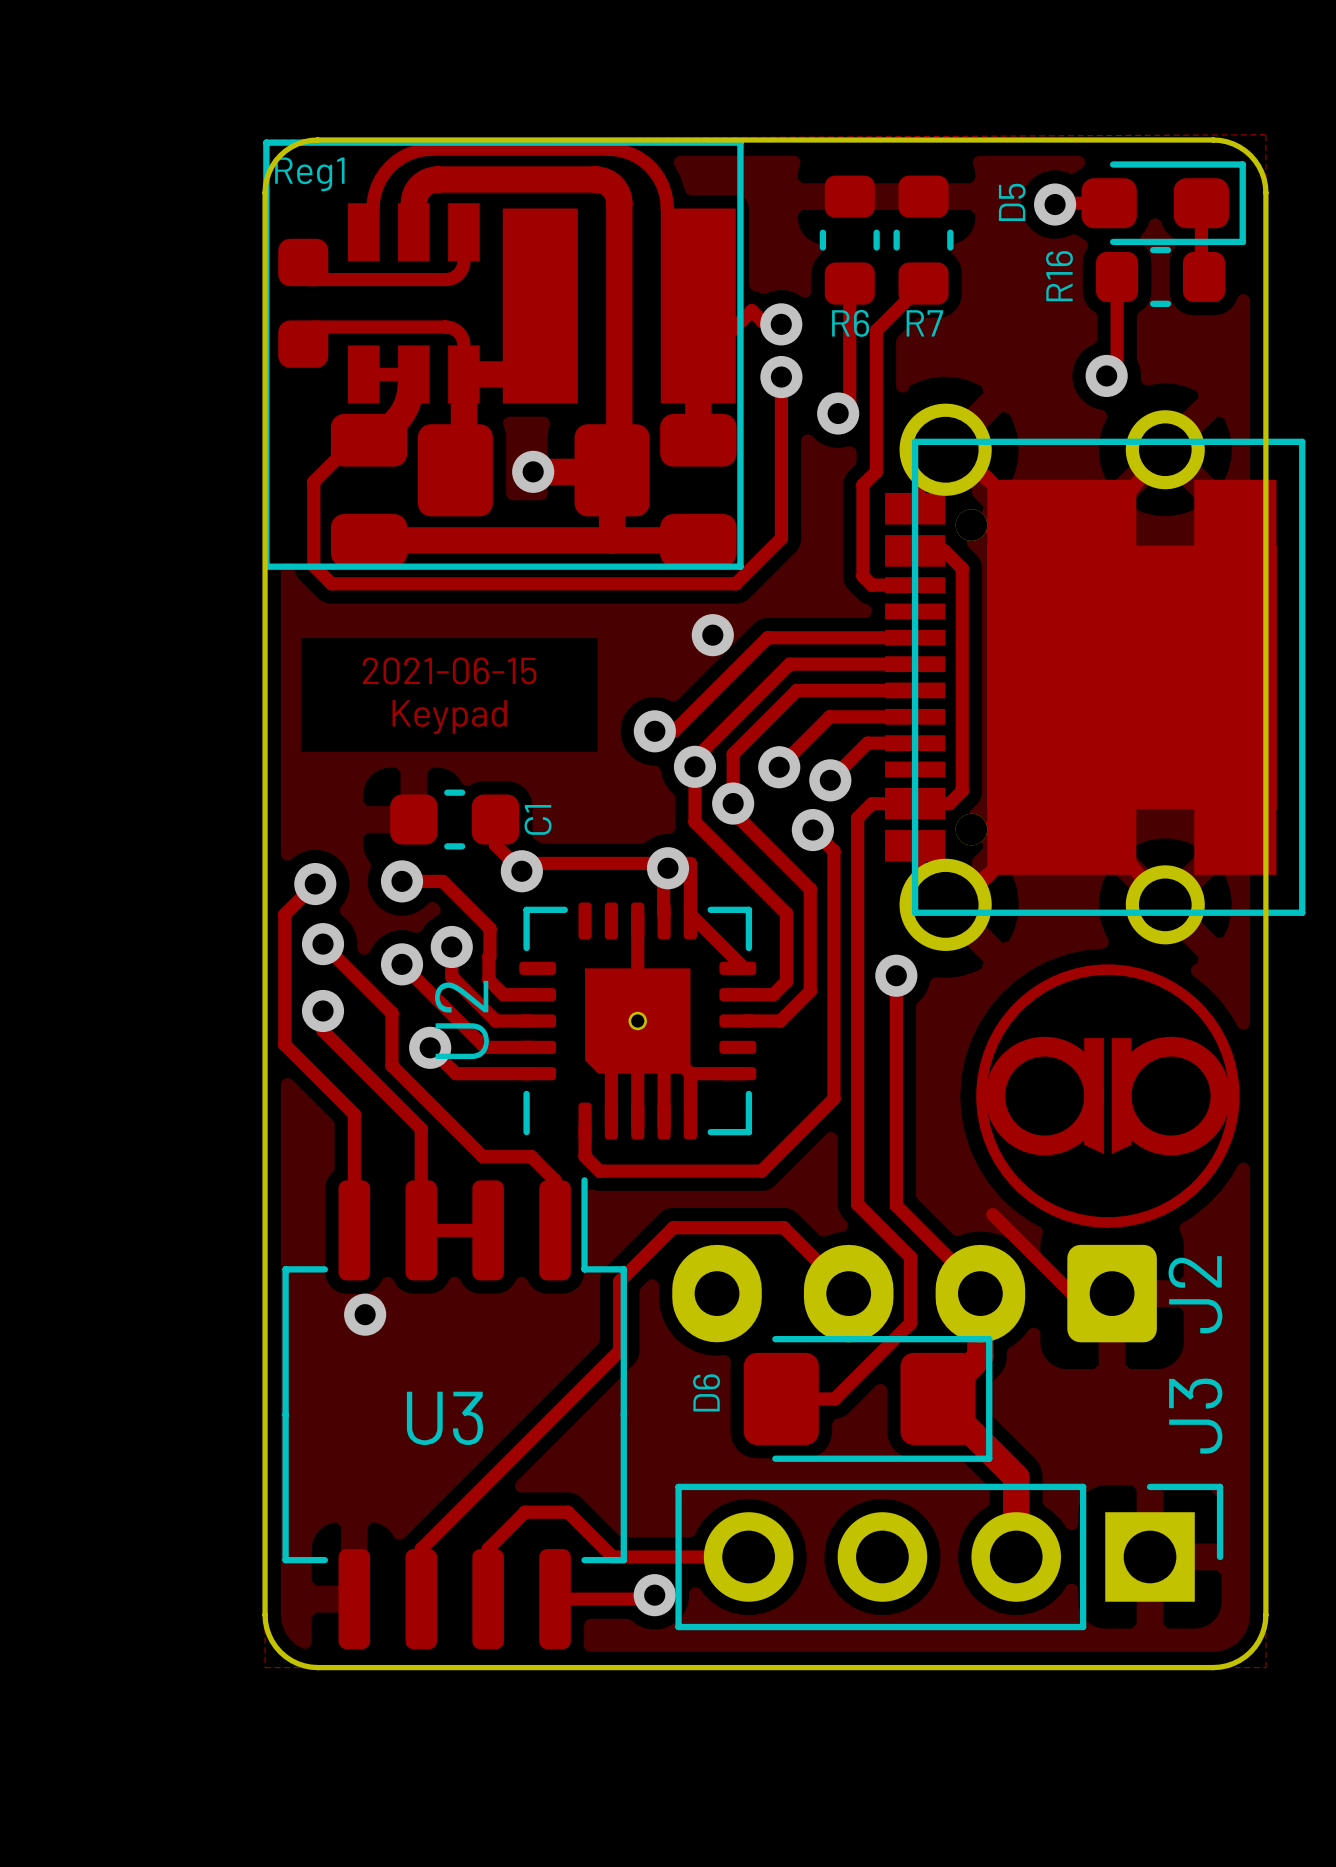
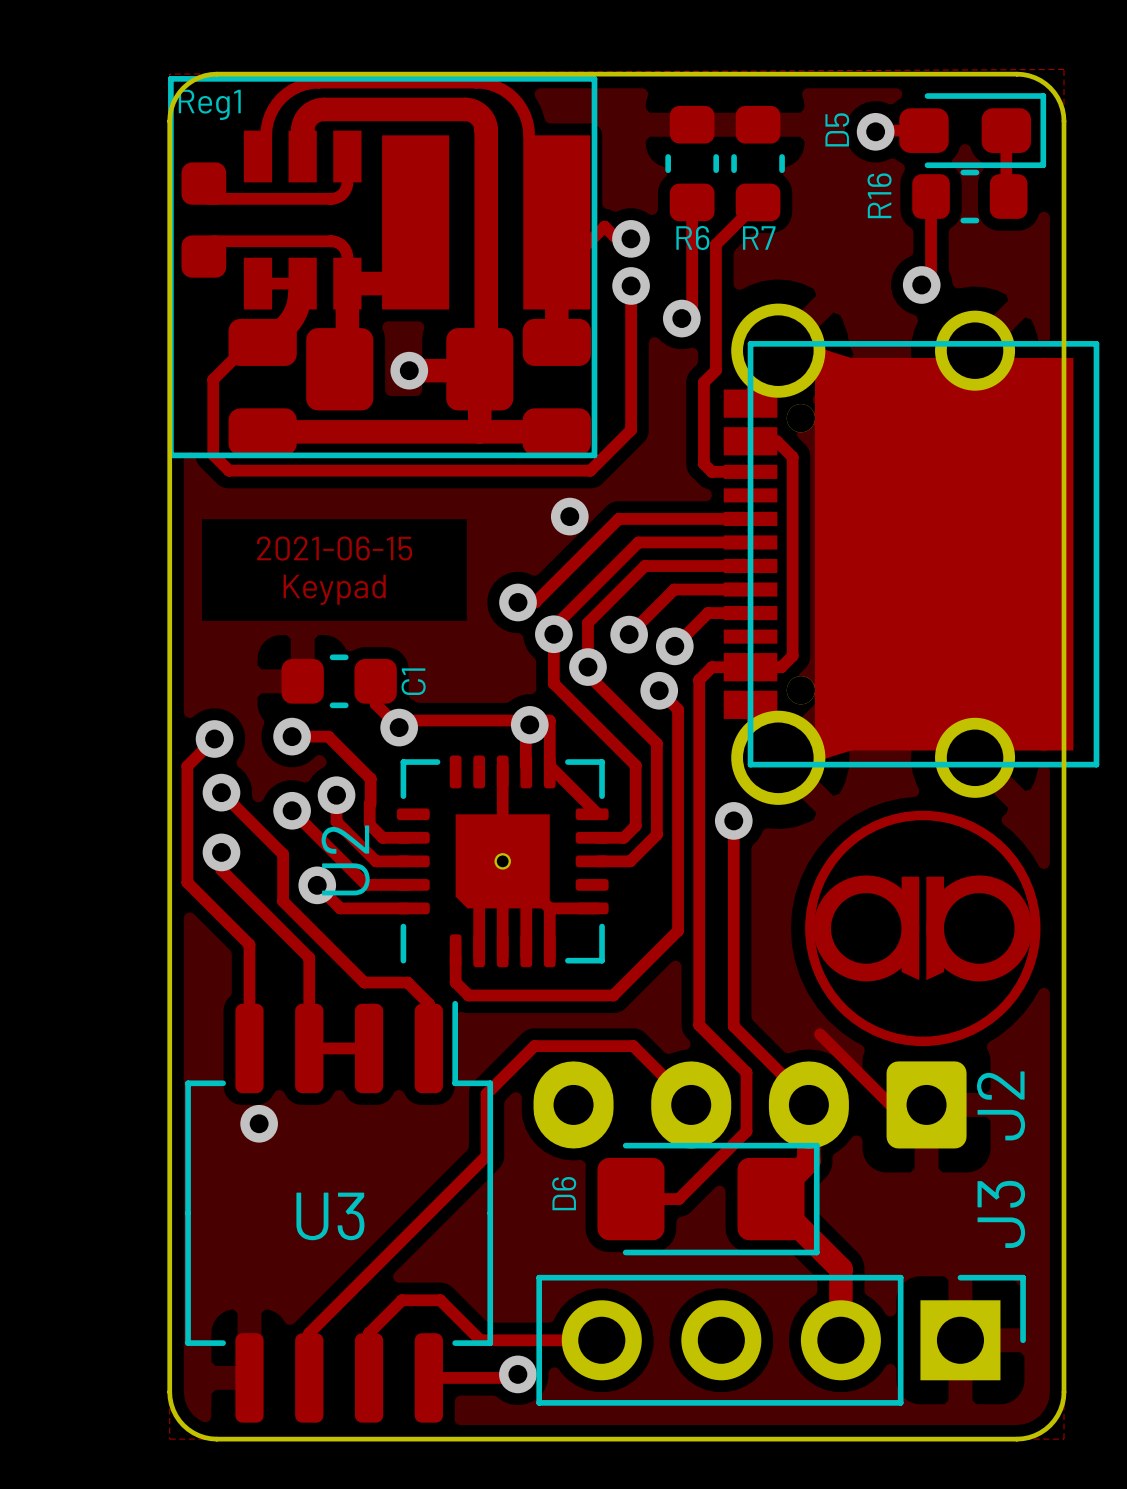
Reg1 footprint: [263, 139, 744, 570] -> [168, 76, 598, 459]
J2 footprint: [885, 403, 1306, 951] -> [723, 303, 1100, 805]

